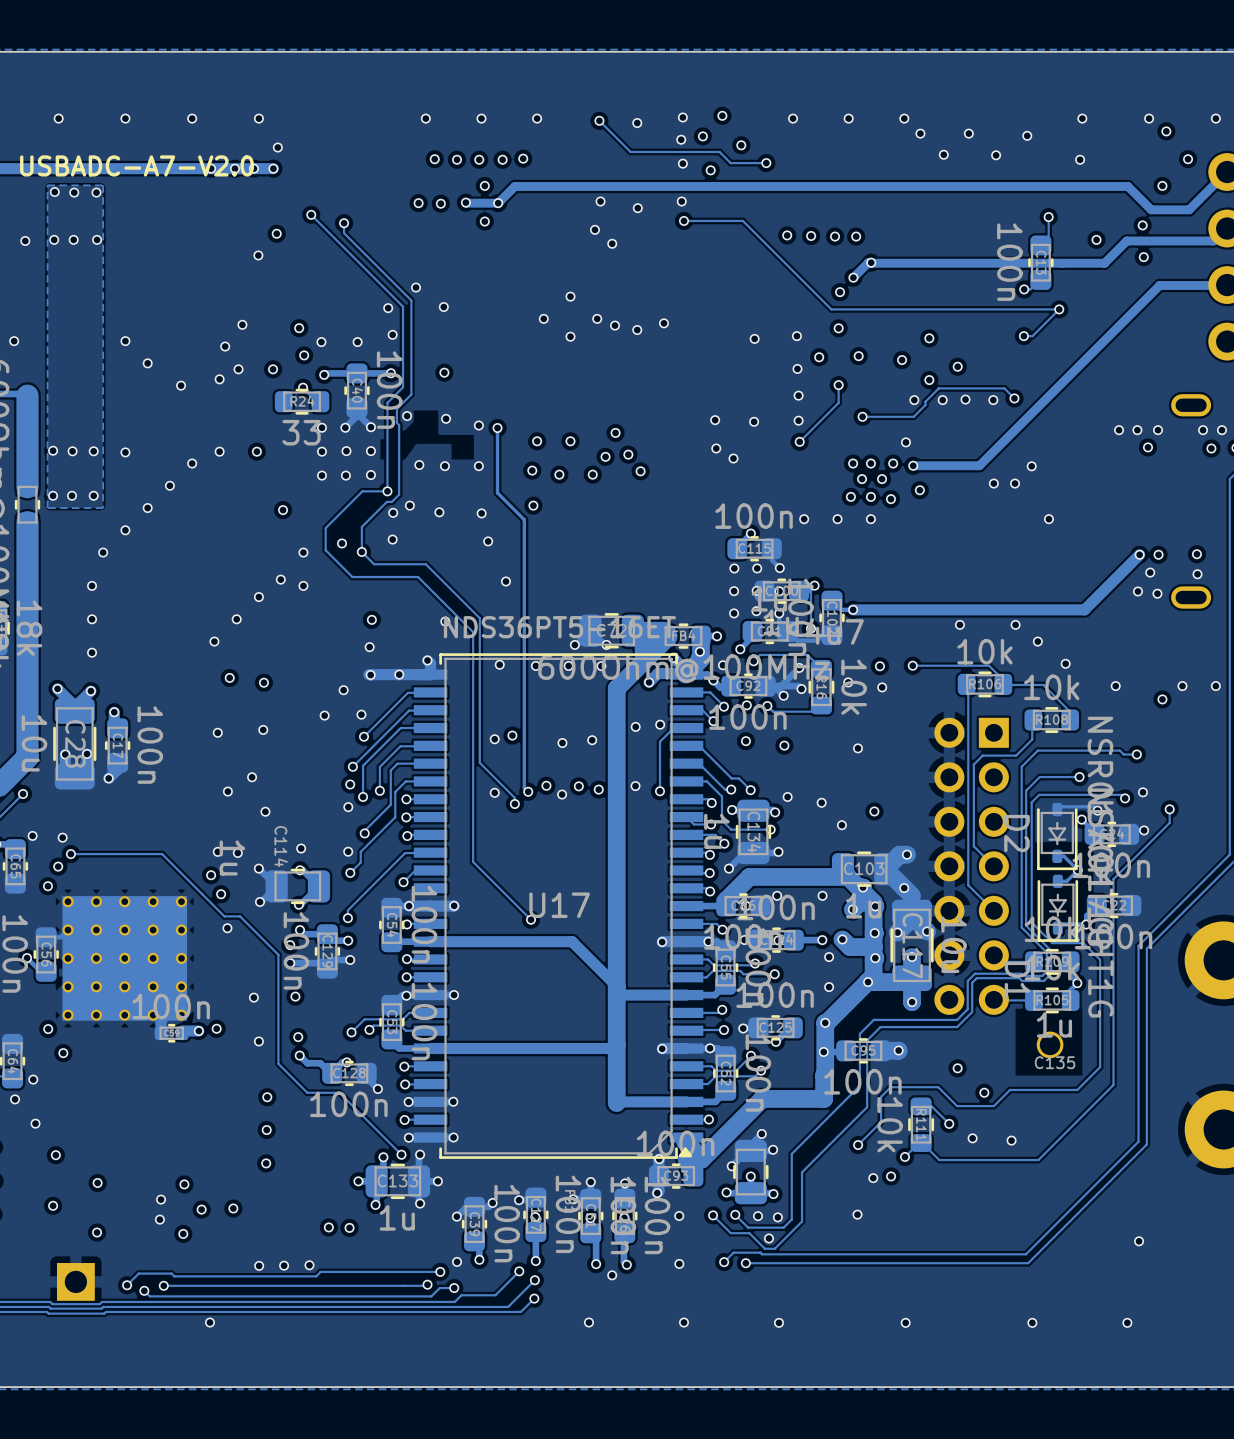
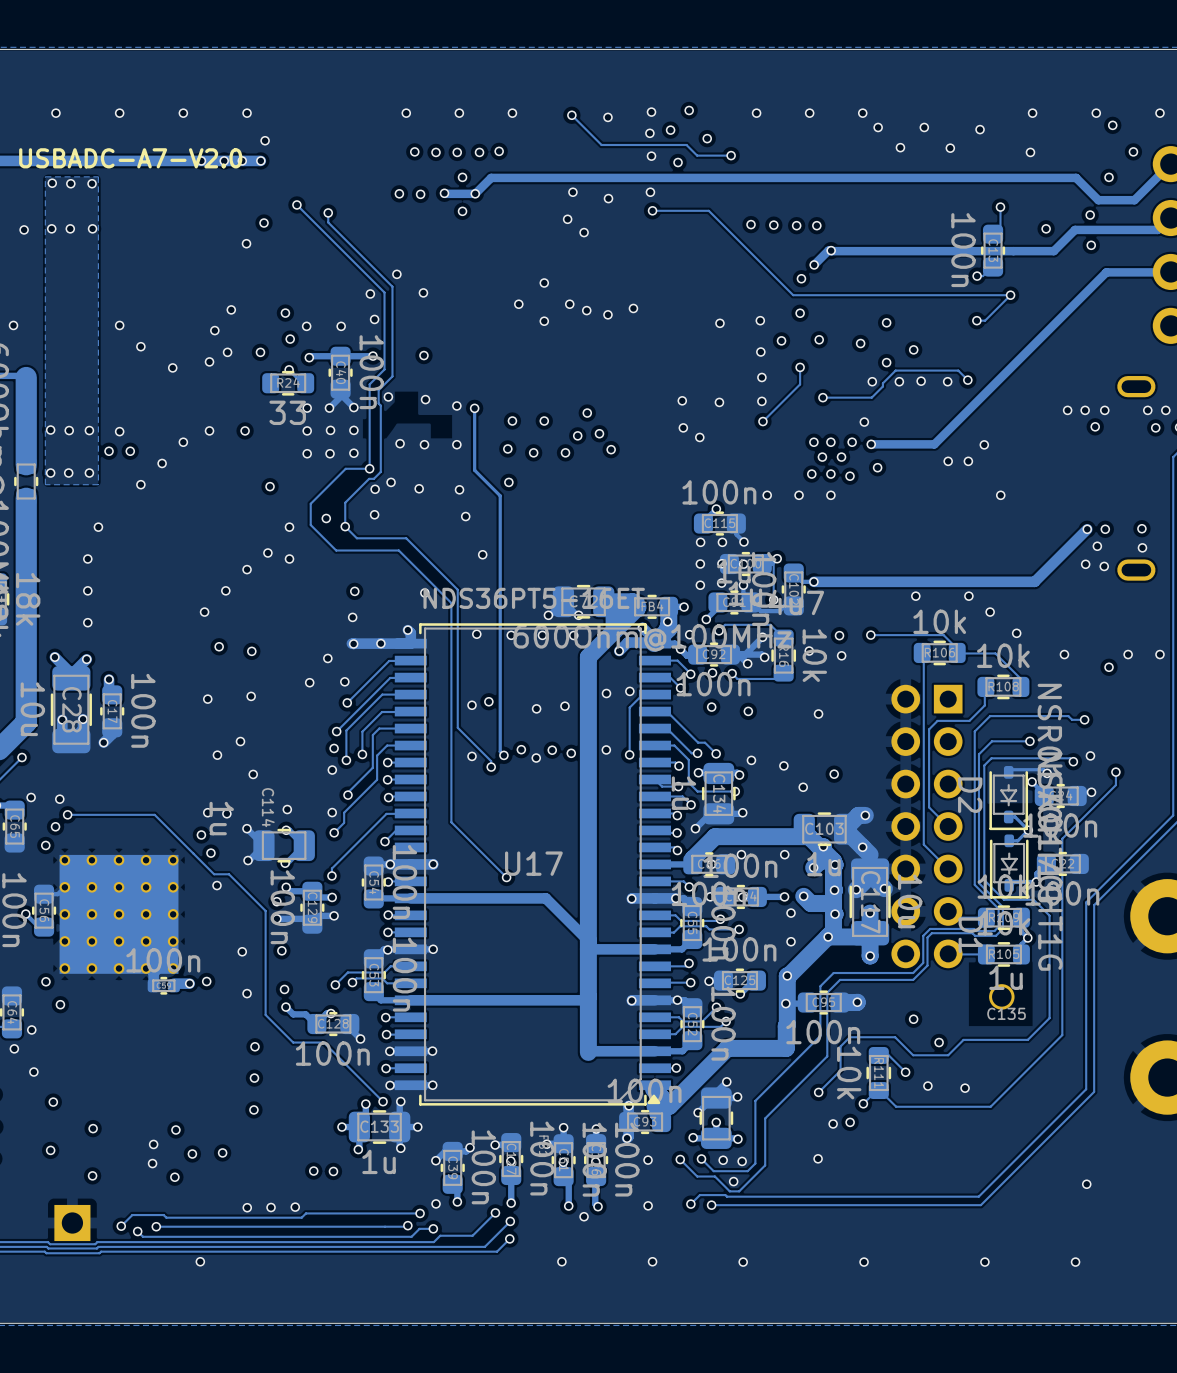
via: none -> (109, 451)
via: none -> (130, 451)
via: (125, 530) -> none

